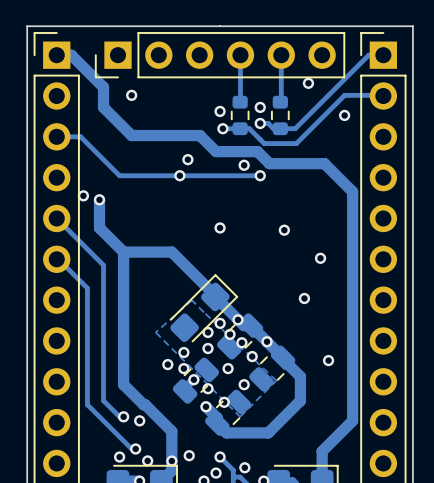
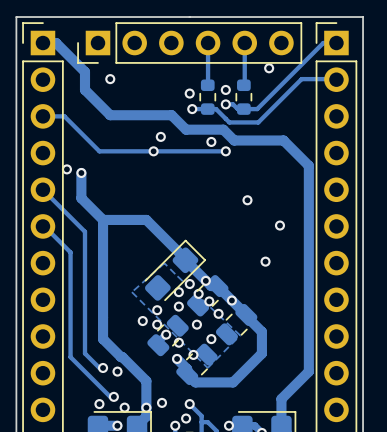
via: (344, 115) -> none
via: (220, 227) -> none
via: (328, 360) -> none
via: (244, 467) -> none

